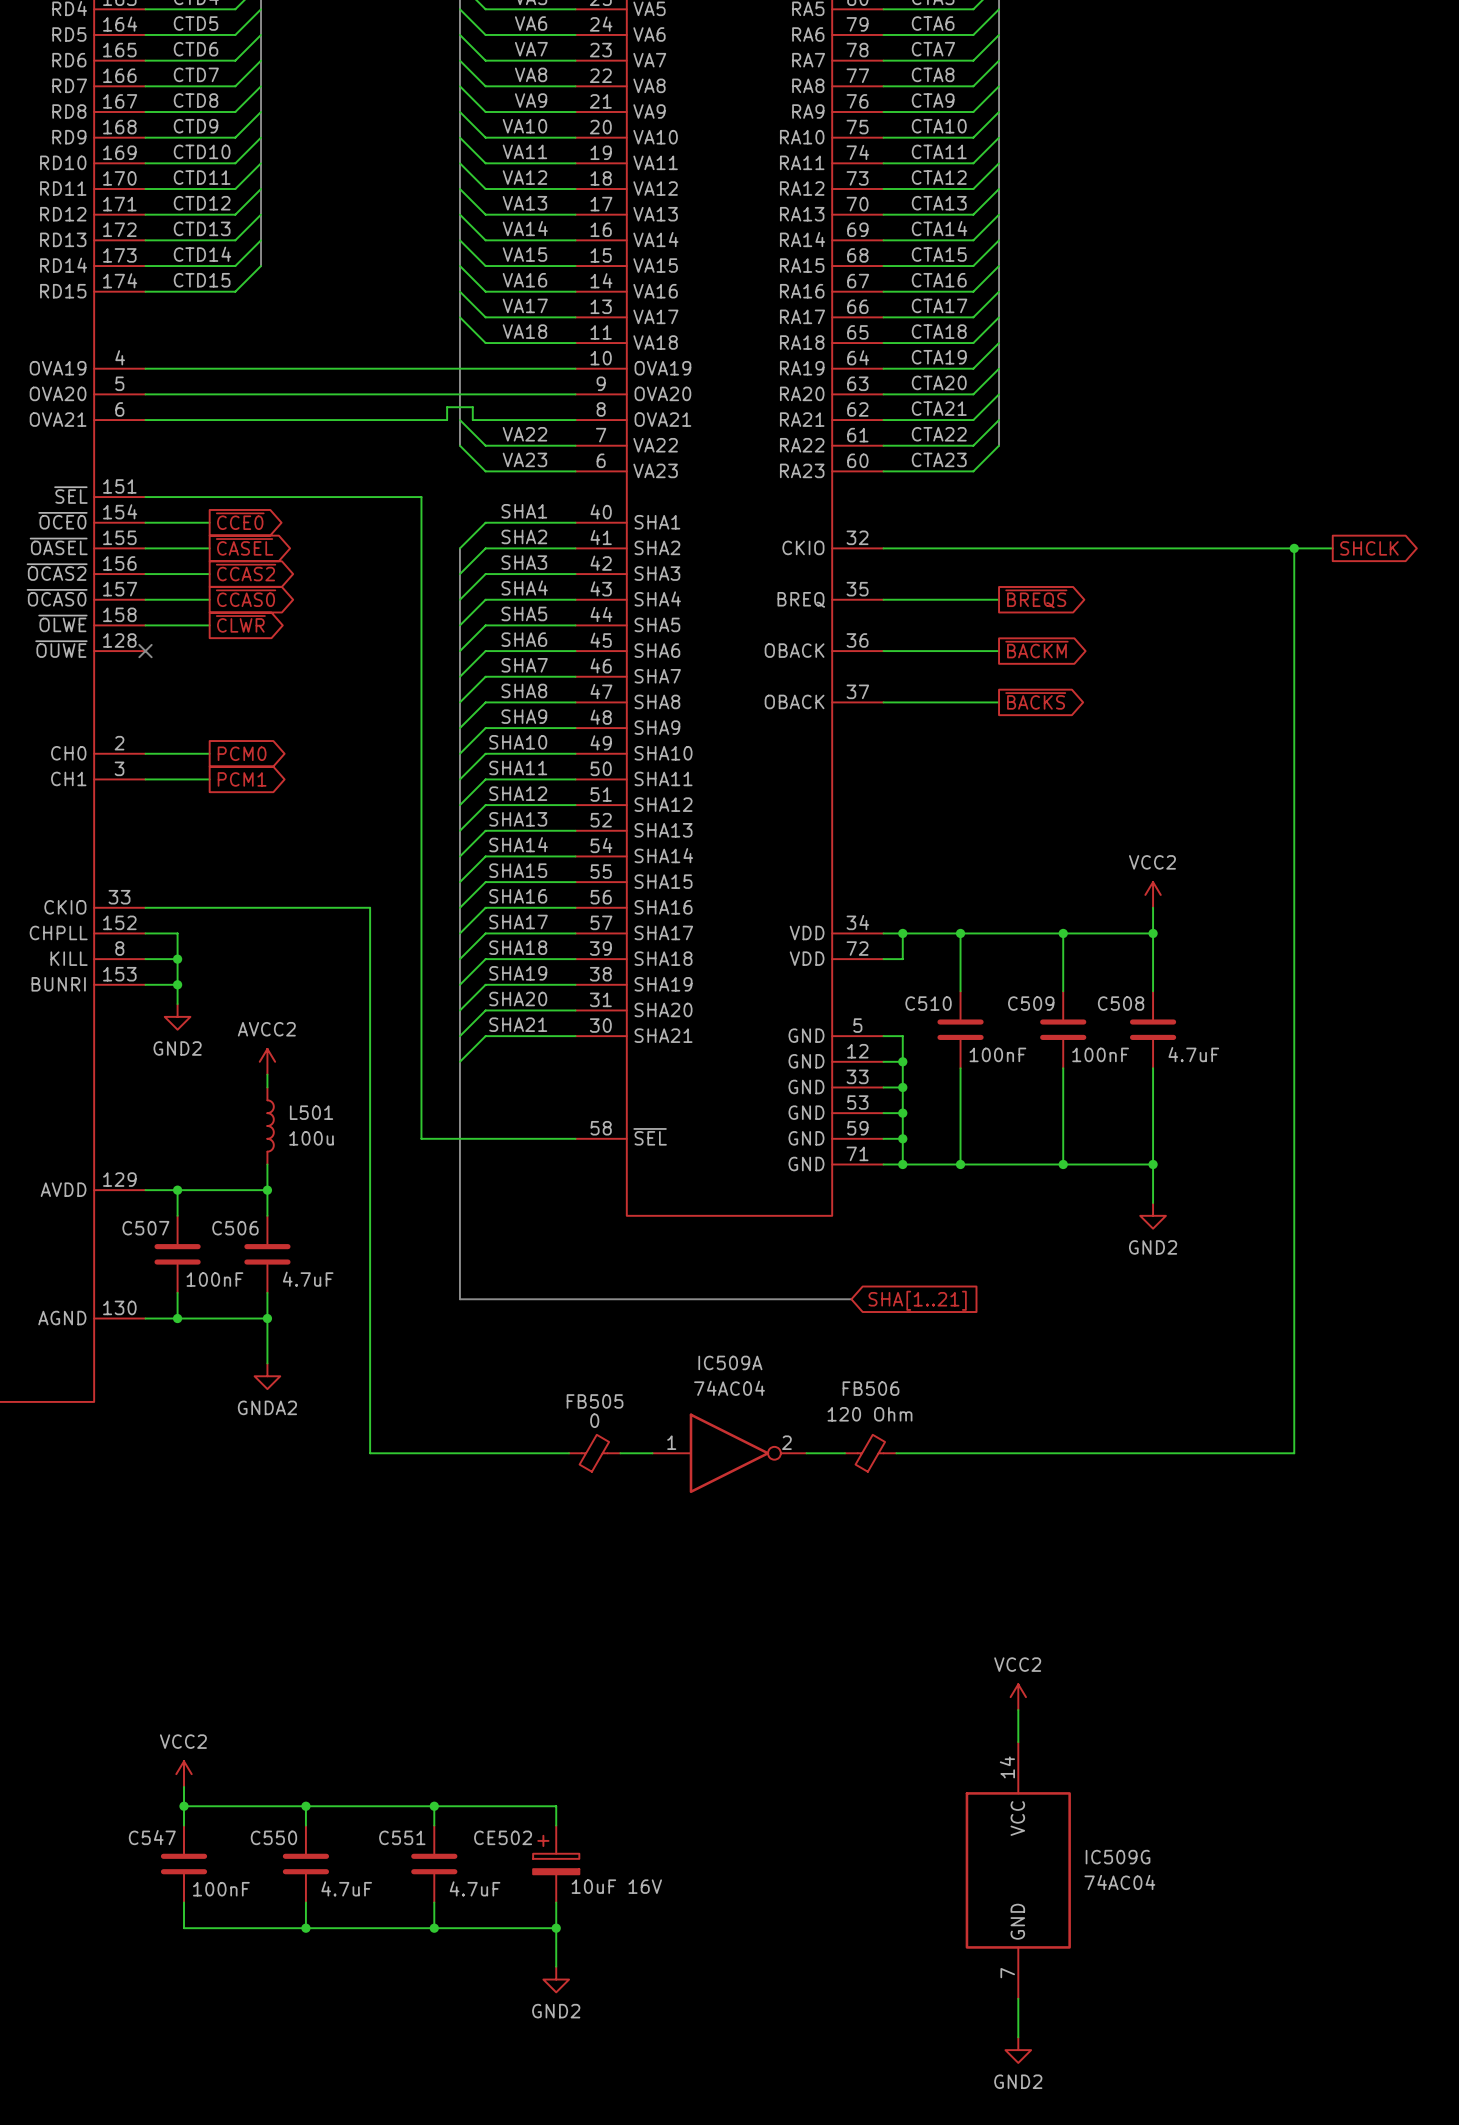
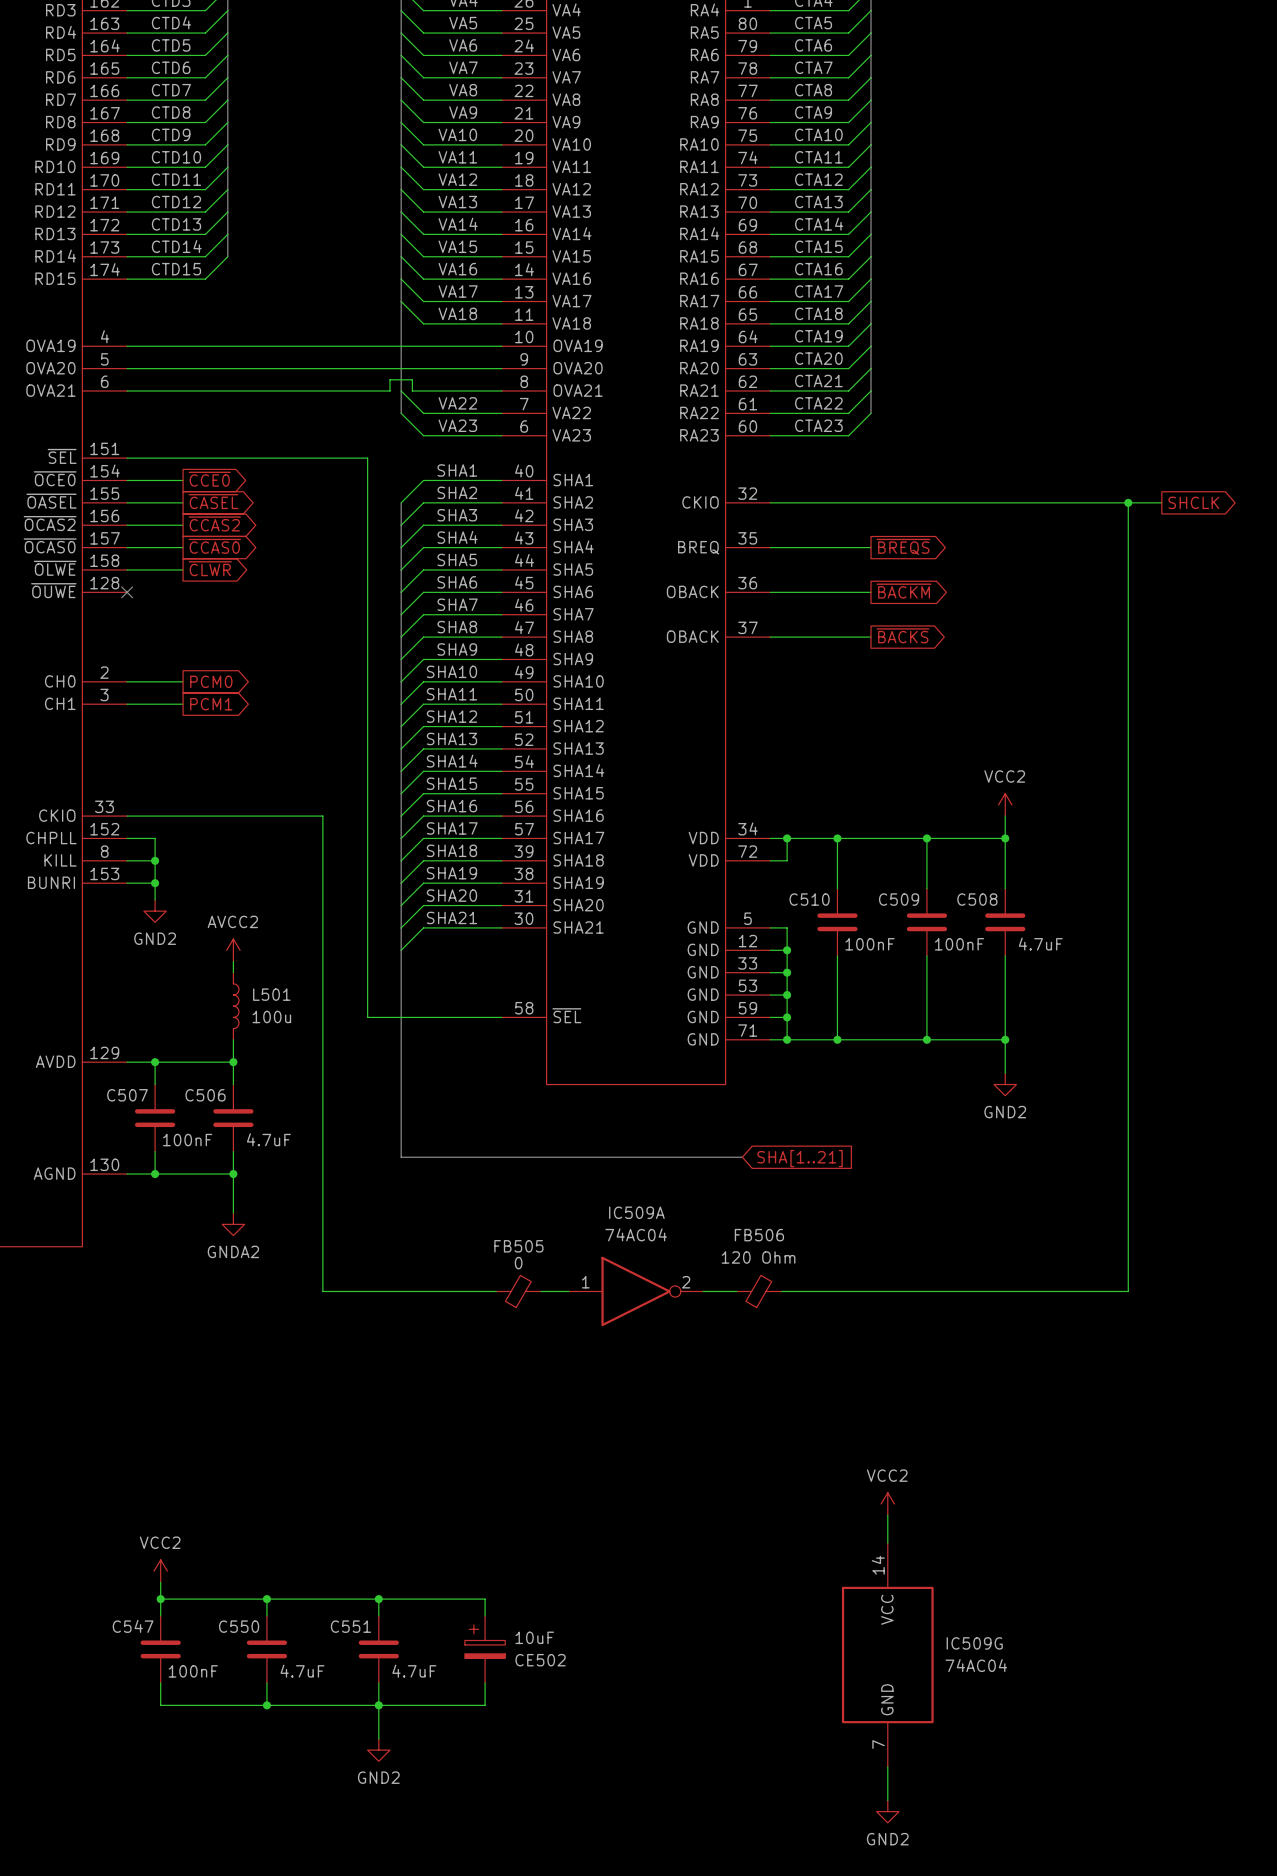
CE502 name position: CE502 (503, 1837) -> CE502 (540, 1660)
CE502 value: 10uF 16V (616, 1886) -> 10uF (534, 1637)
wire: (556, 1928) (556, 1966) -> (378, 1705) (378, 1738)
junction: (556, 1928) -> none
power symbol position: GND2 (556, 1979) -> GND2 (378, 1750)

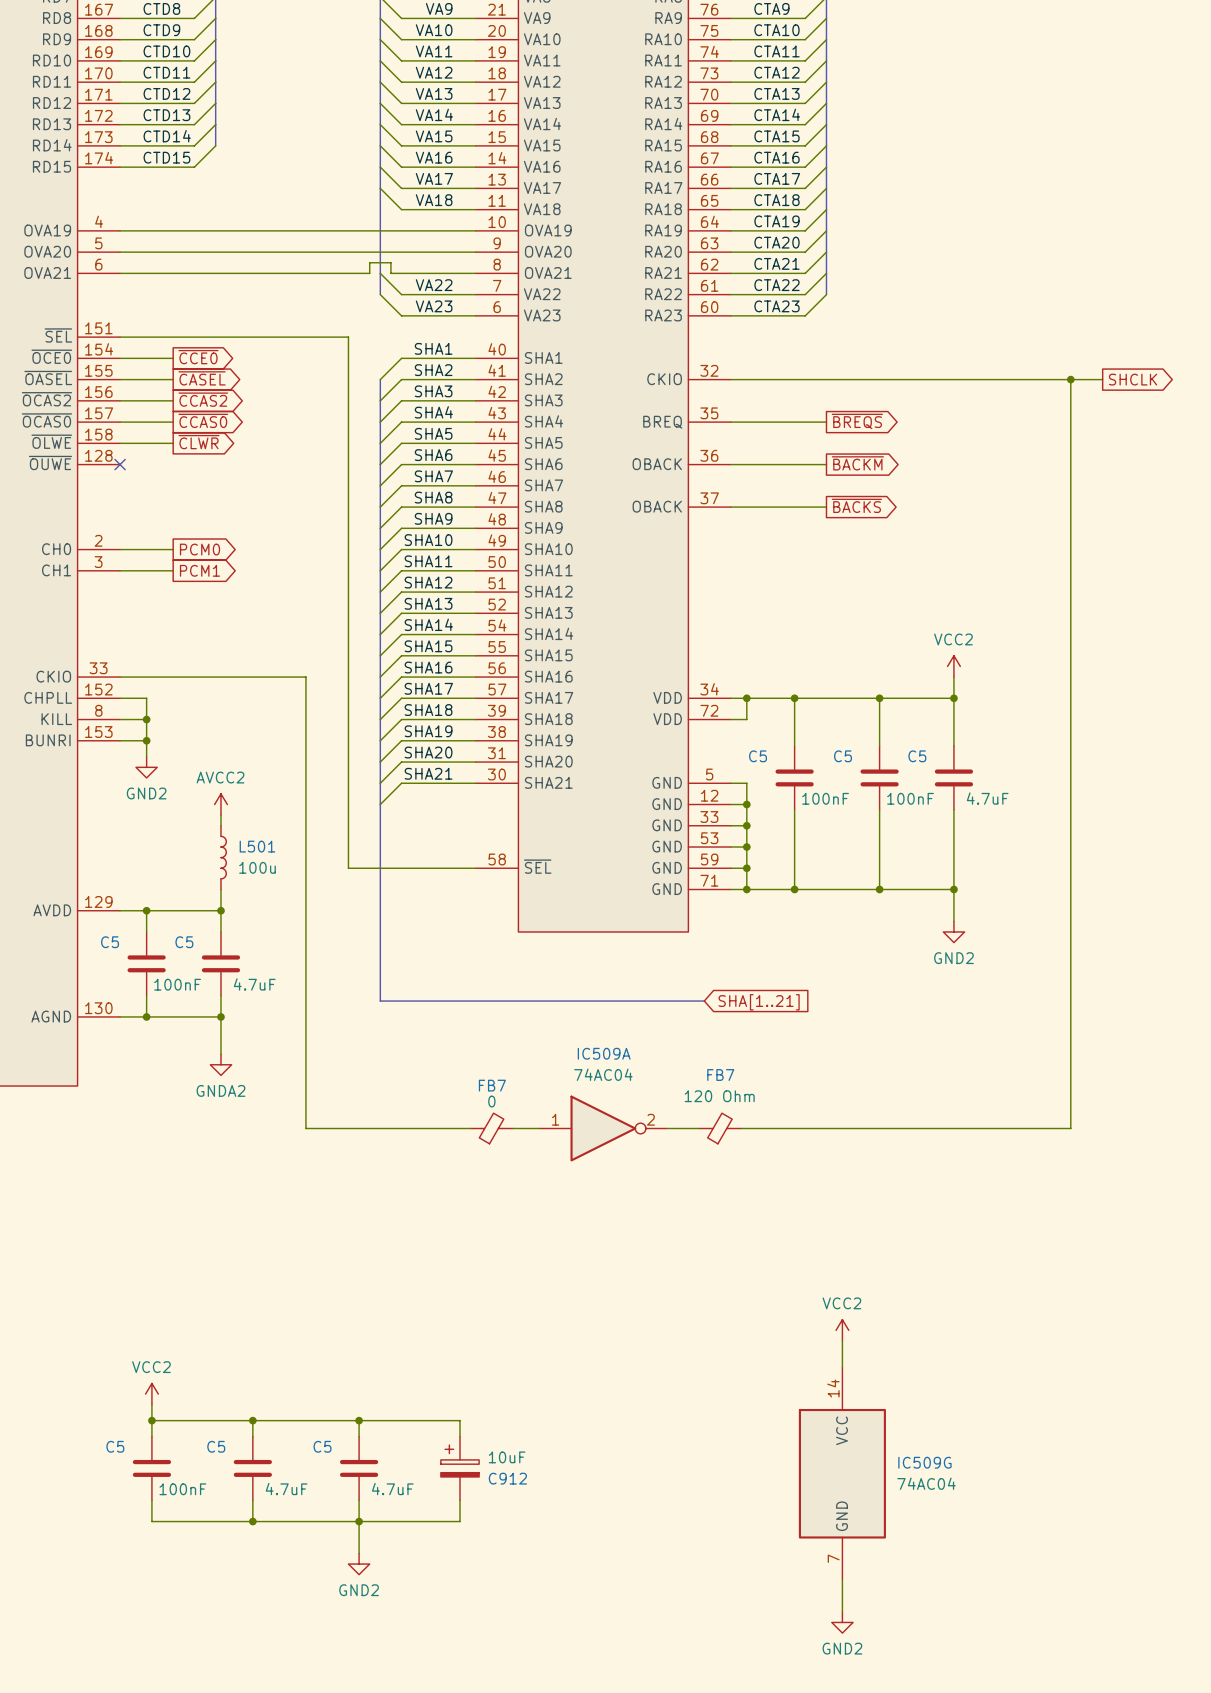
C510 name: C510 (809, 899) -> C5 (758, 756)
C509 name: C509 (899, 899) -> C5 (843, 756)
C508 name: C508 (977, 899) -> C5 (917, 756)
C507 name: C507 (127, 1095) -> C5 (110, 942)
C506 name: C506 (205, 1095) -> C5 (184, 942)
FB506 name: FB506 (759, 1235) -> FB7 (720, 1075)
FB505 name: FB505 (518, 1246) -> FB7 (492, 1085)
C547 name: C547 (133, 1626) -> C5 (115, 1446)
C550 name: C550 (239, 1626) -> C5 (216, 1446)
C551 name: C551 (350, 1626) -> C5 (322, 1446)
CE502 name: CE502 (540, 1660) -> C912 (507, 1478)

